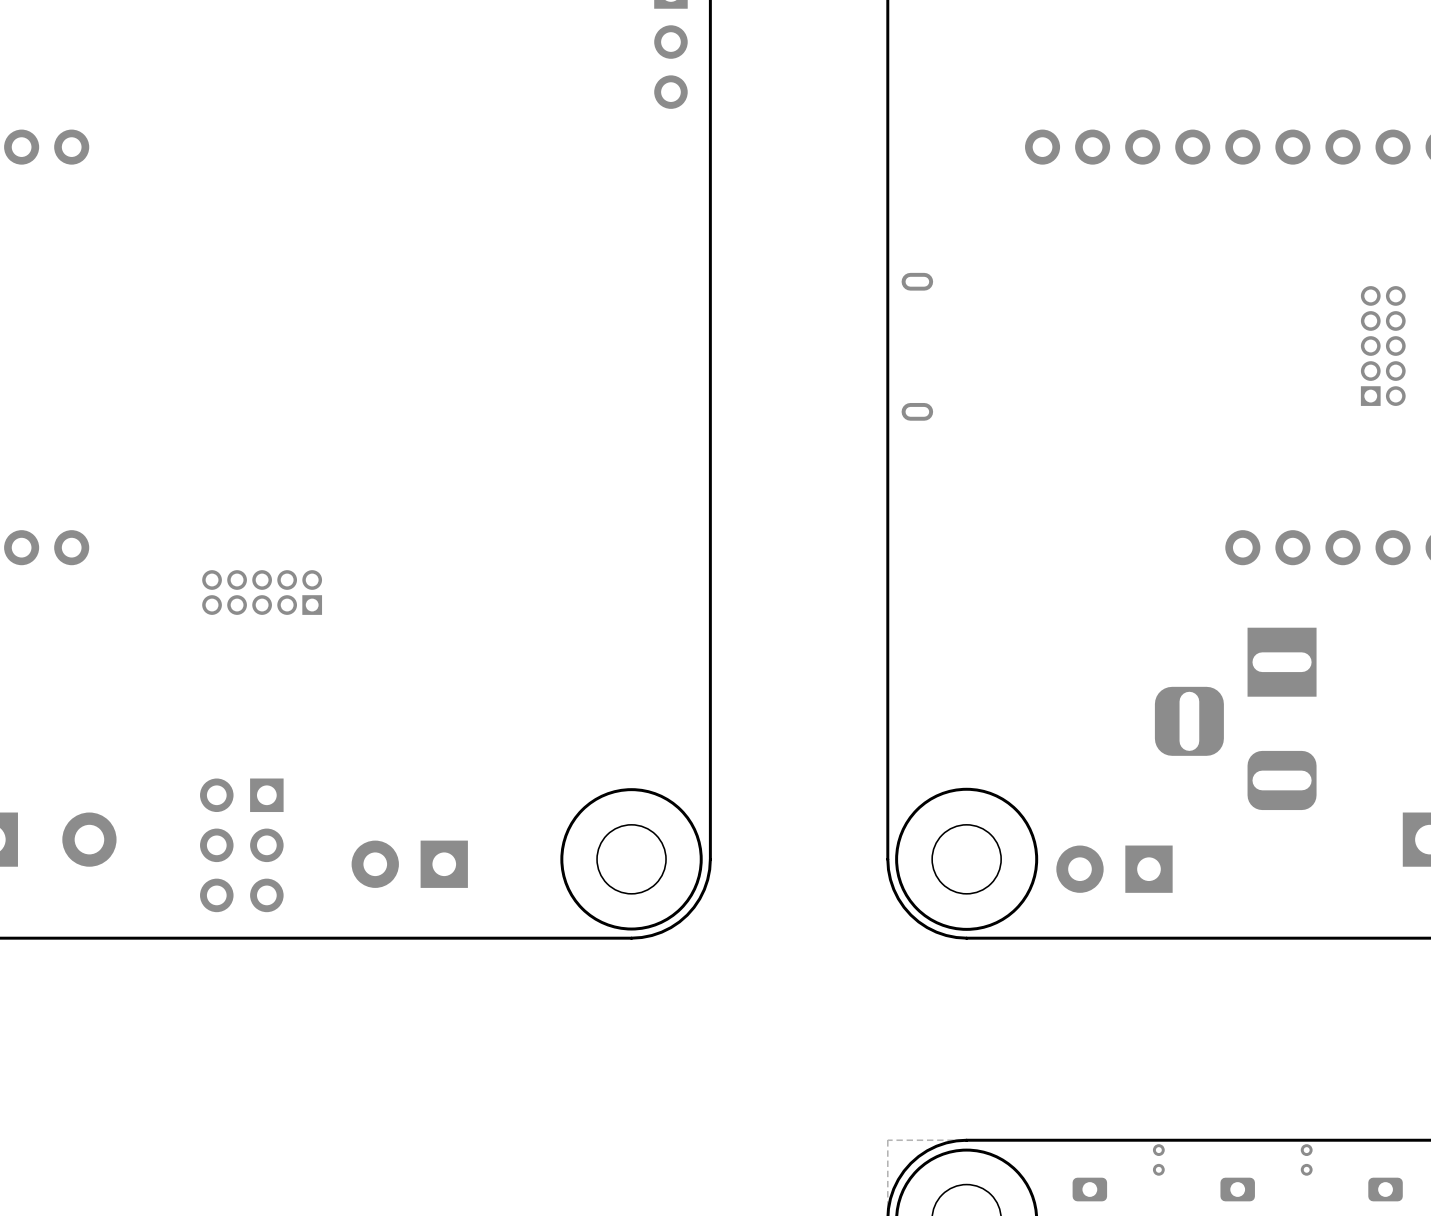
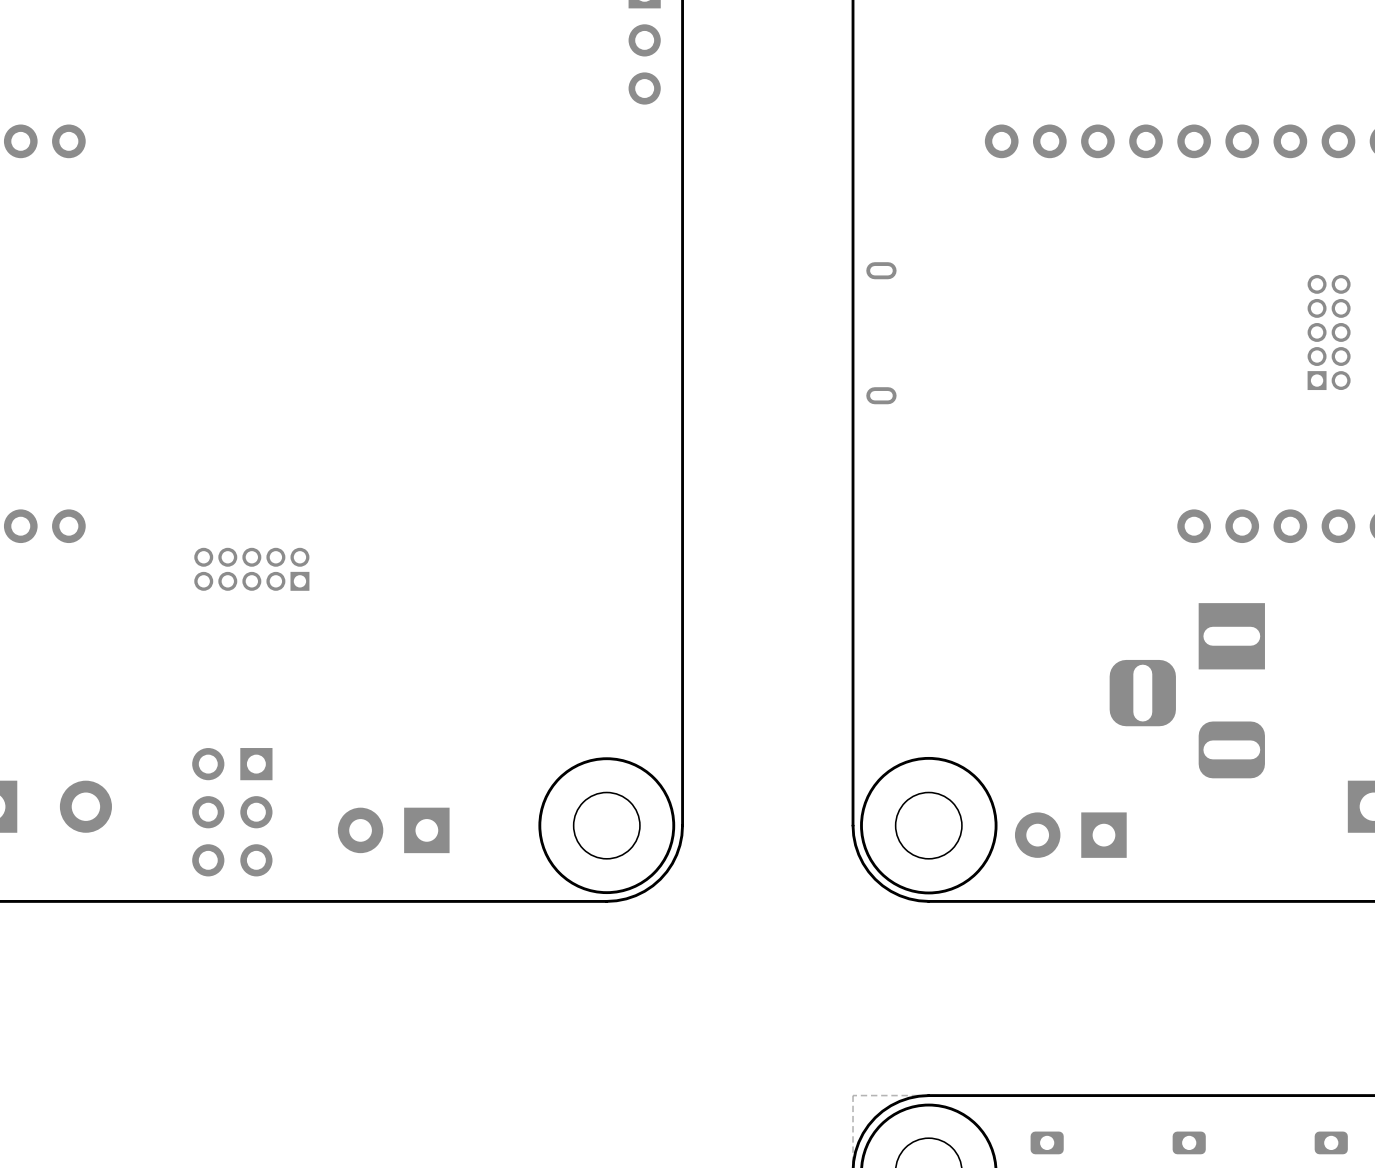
via: (1158, 1150) -> none
via: (1306, 1150) -> none
via: (1158, 1169) -> none
via: (1306, 1169) -> none

